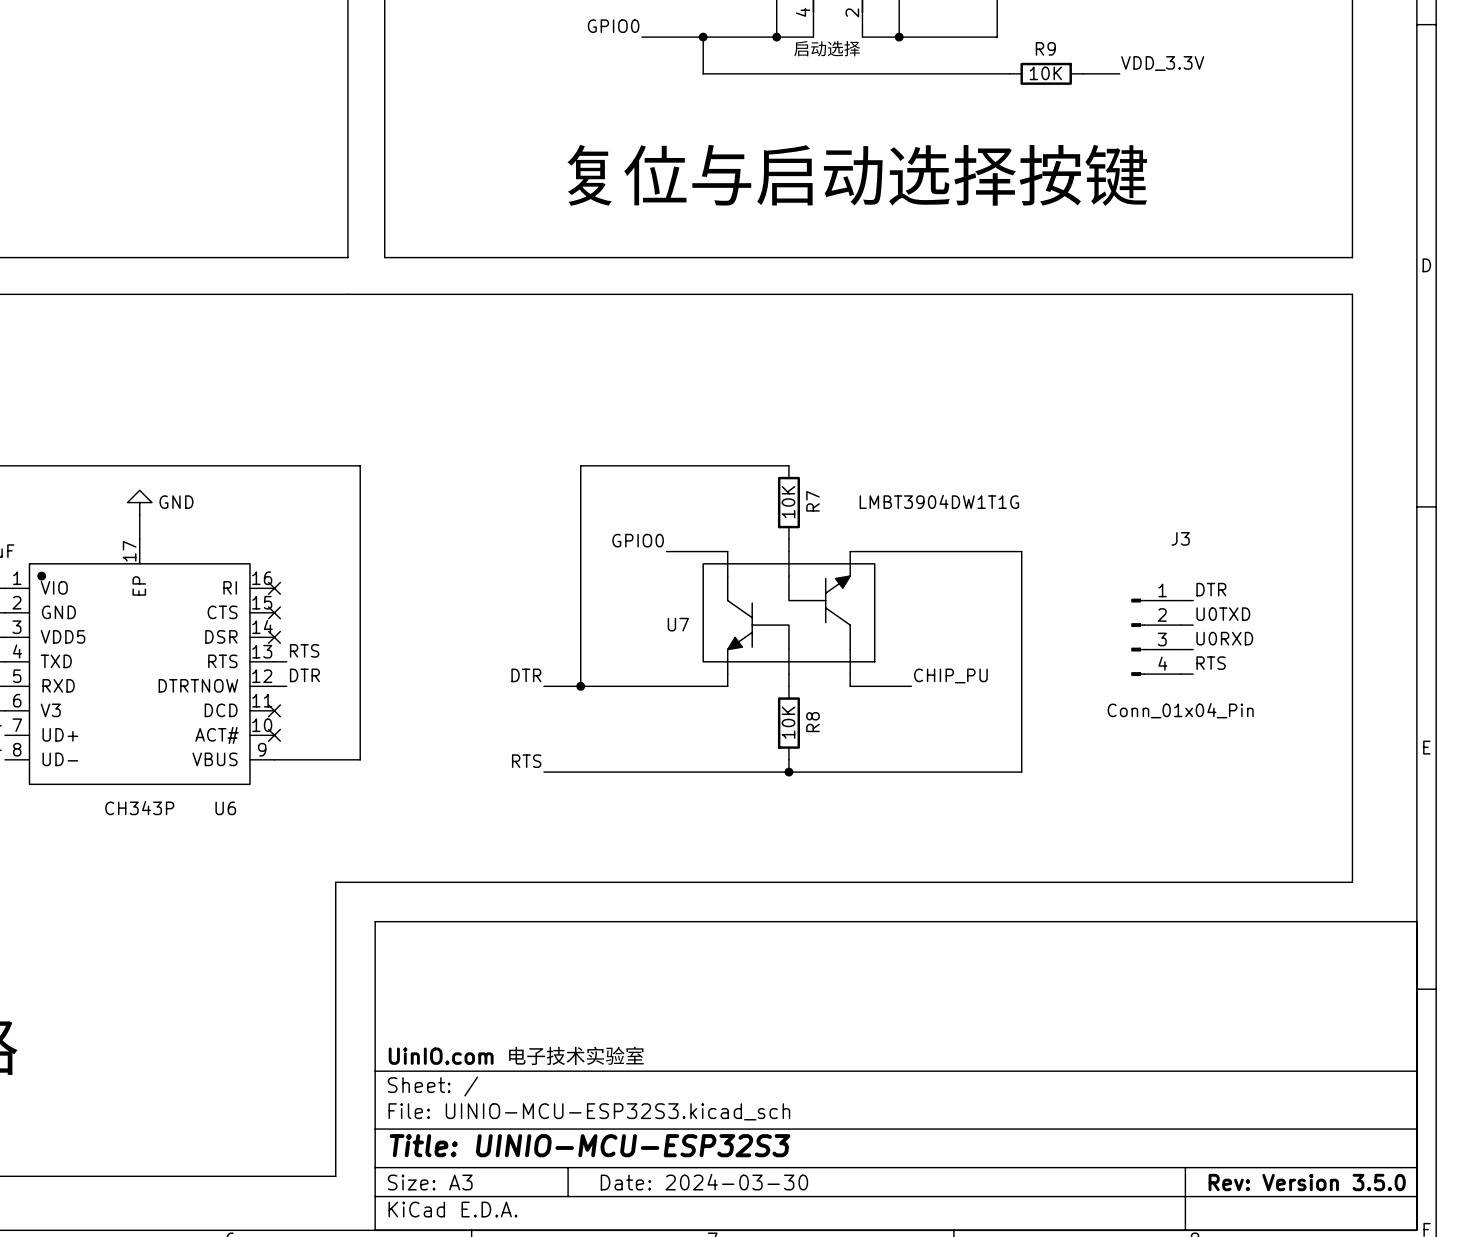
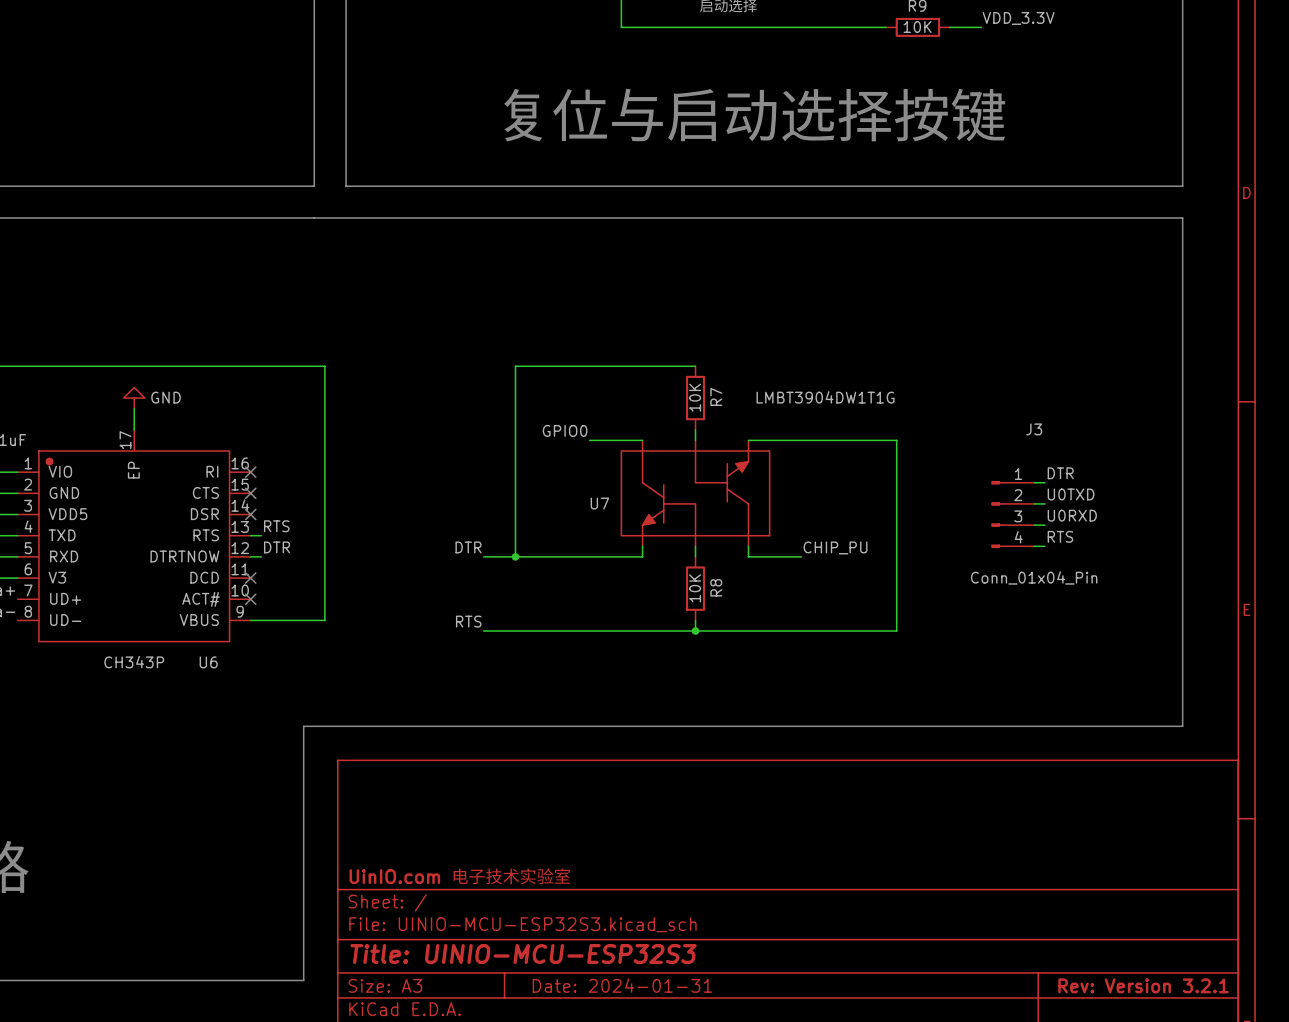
title block: Date: 2024-03-30 (704, 1182) -> Date: 2024-01-31 (622, 985)
title block: Rev: Version 3.5.0 (1307, 1182) -> Rev: Version 3.2.1 (1143, 985)

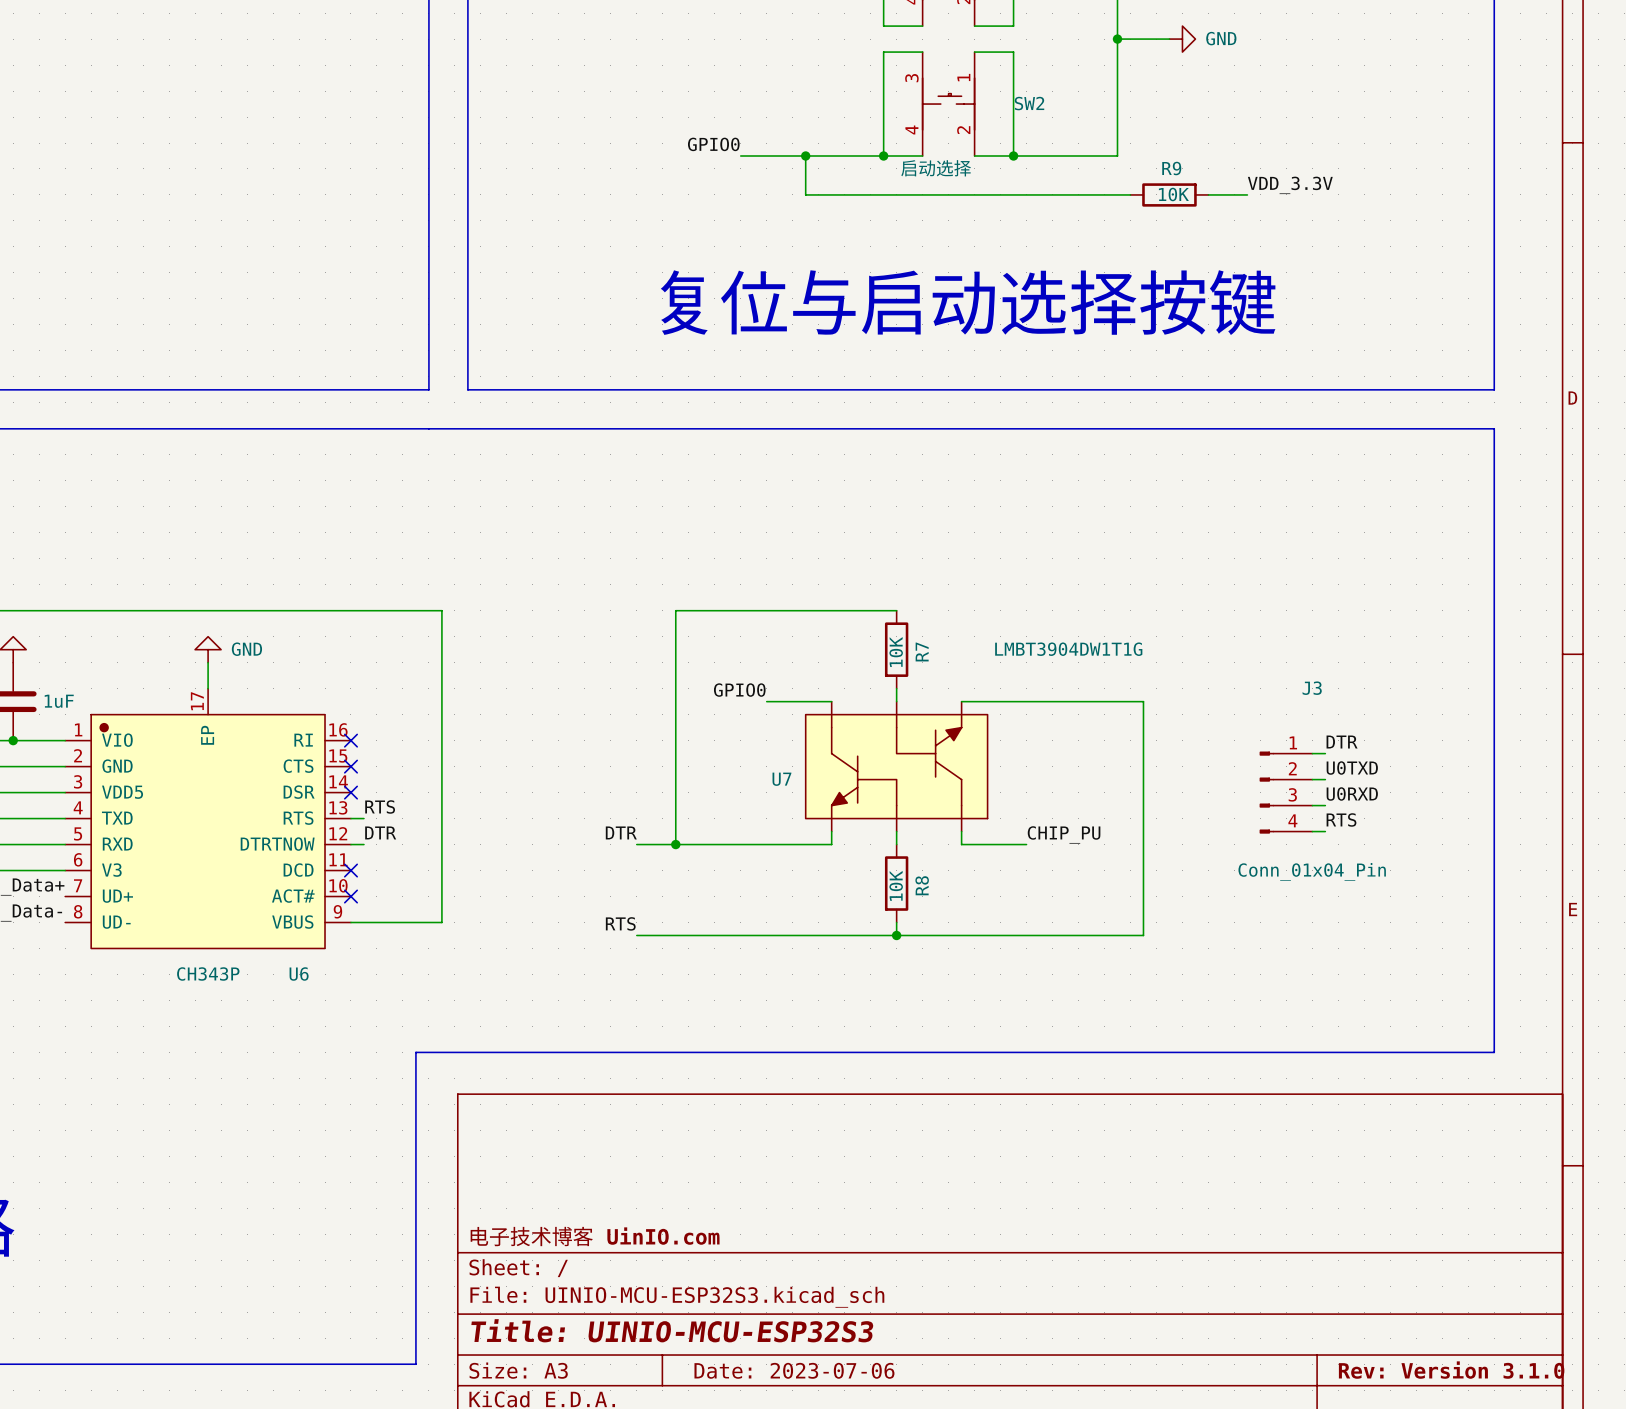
title block: UinIO.com 电子技术实验室 (460, 876) -> 电子技术博客 UinIO.com (595, 1236)
title block: Date: 2024-01-31 (622, 985) -> Date: 2023-07-06 (794, 1370)
title block: Rev: Version 3.2.1 (1143, 985) -> Rev: Version 3.1.0 (1451, 1370)

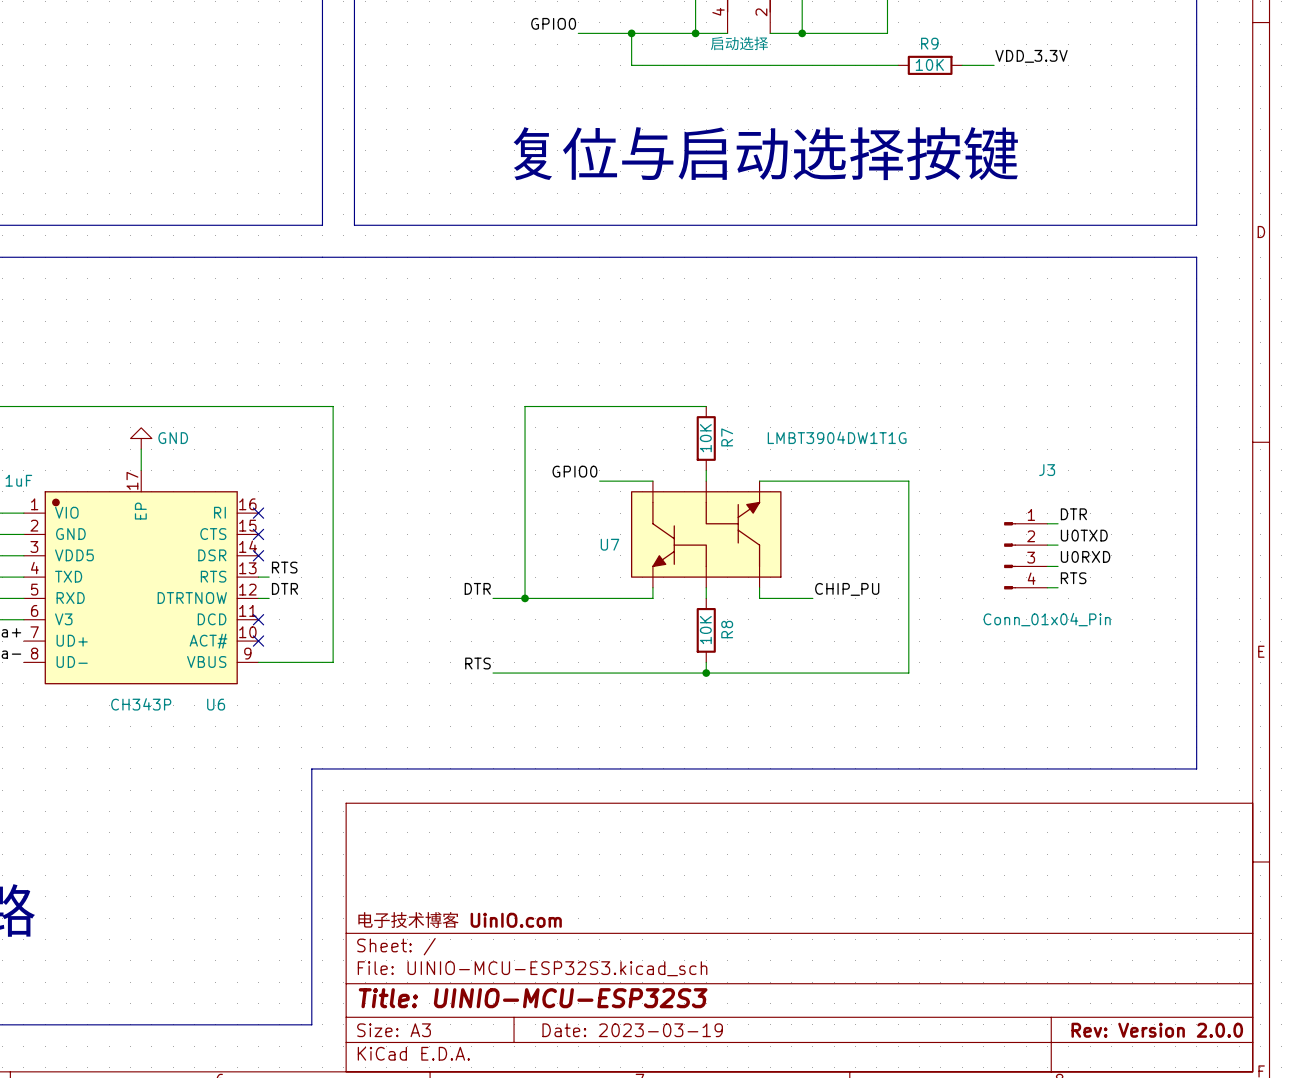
title block: Date: 2023-07-06 (794, 1370) -> Date: 2023-03-19 (632, 1030)
title block: Rev: Version 3.1.0 (1451, 1370) -> Rev: Version 2.0.0 (1157, 1030)

